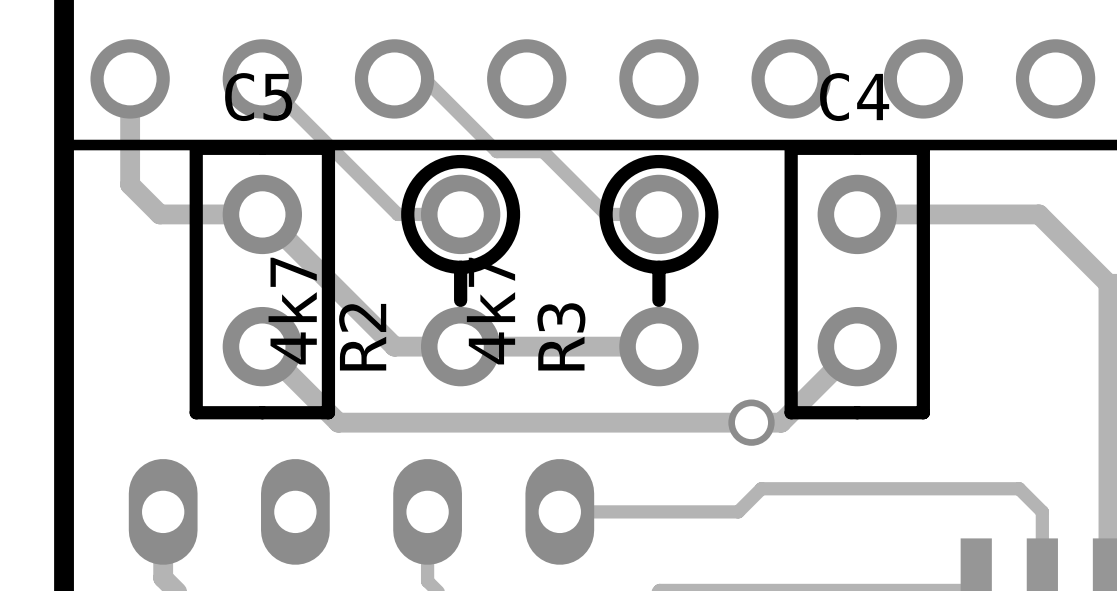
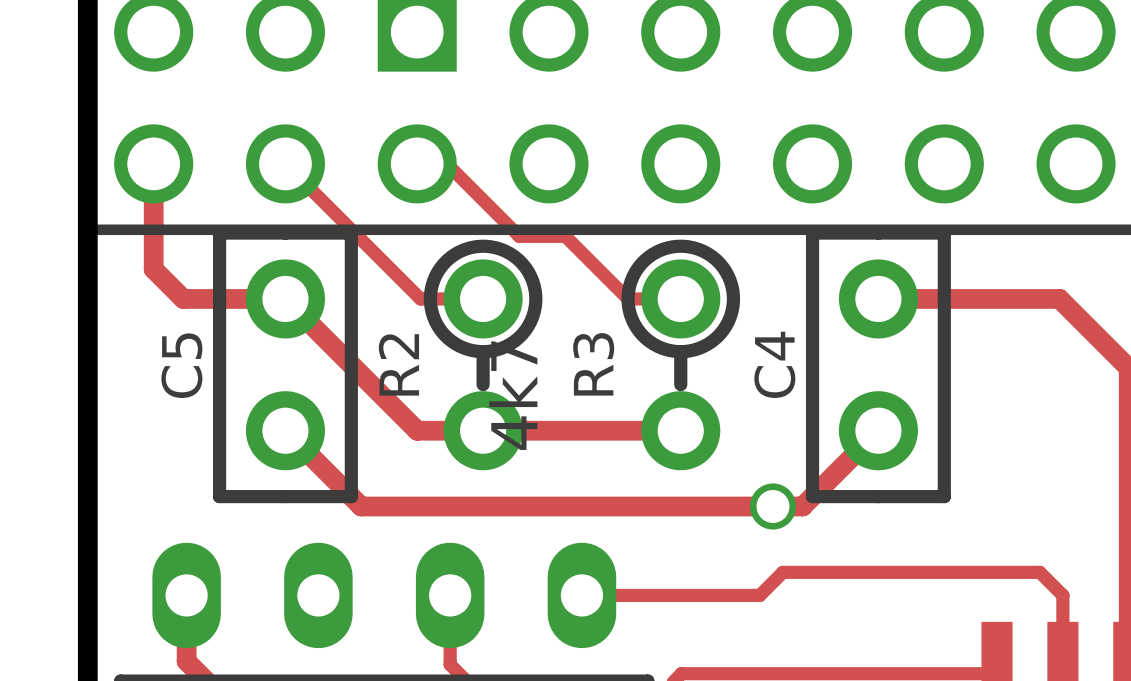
C5 name rotation: 0° (258, 97) -> 90° counterclockwise (181, 365)
C5 name position: C5 (258, 97) -> C5 (181, 365)
C4 name rotation: 0° (854, 97) -> 90° counterclockwise (774, 364)
C4 name position: C4 (854, 97) -> C4 (774, 364)
R2 value: 4k7 (292, 311) -> none
R3 name position: R3 (561, 336) -> R3 (593, 364)
R2 name position: R2 (362, 337) -> R2 (398, 364)

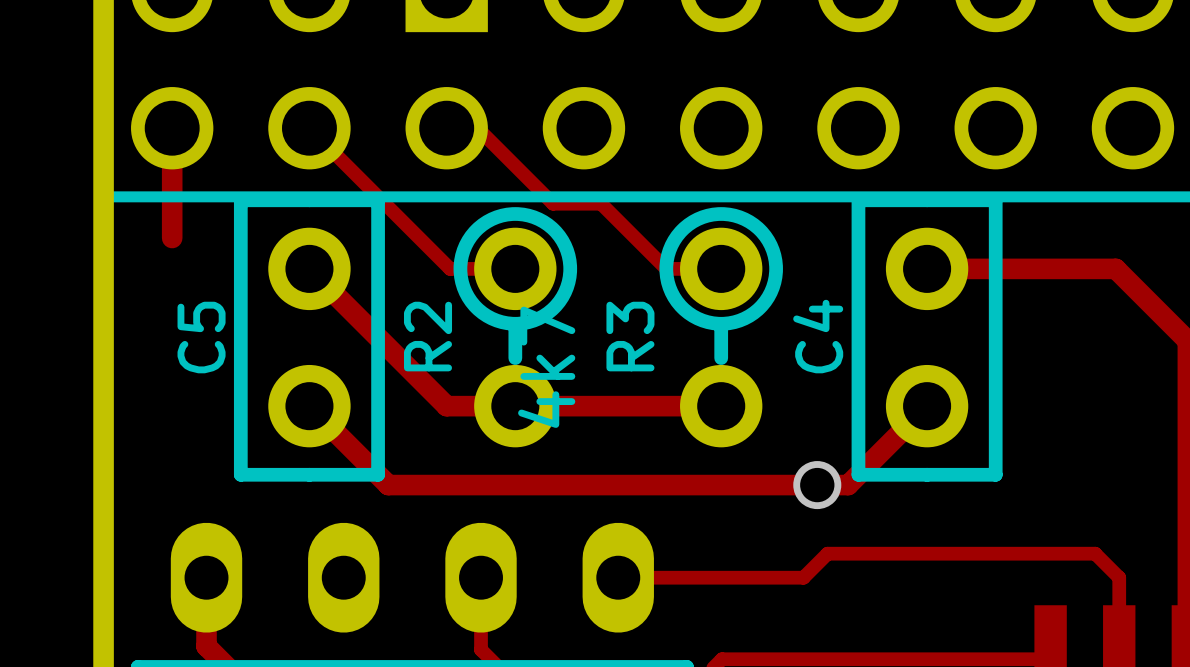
track: (153, 269) (183, 298) (285, 298) -> none

